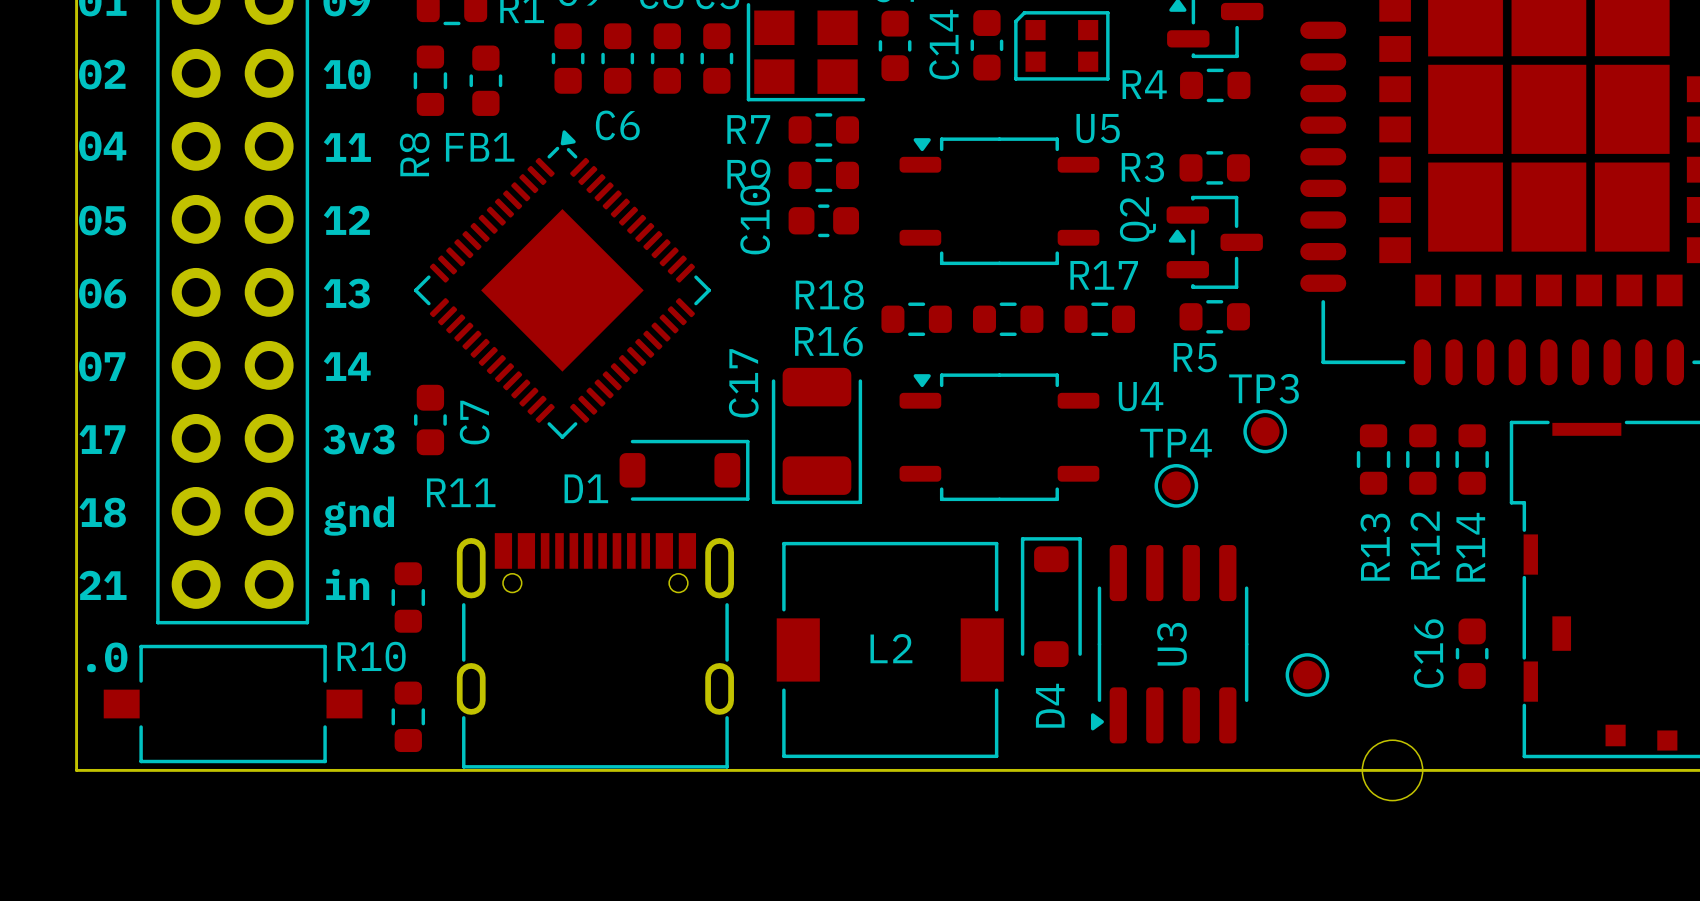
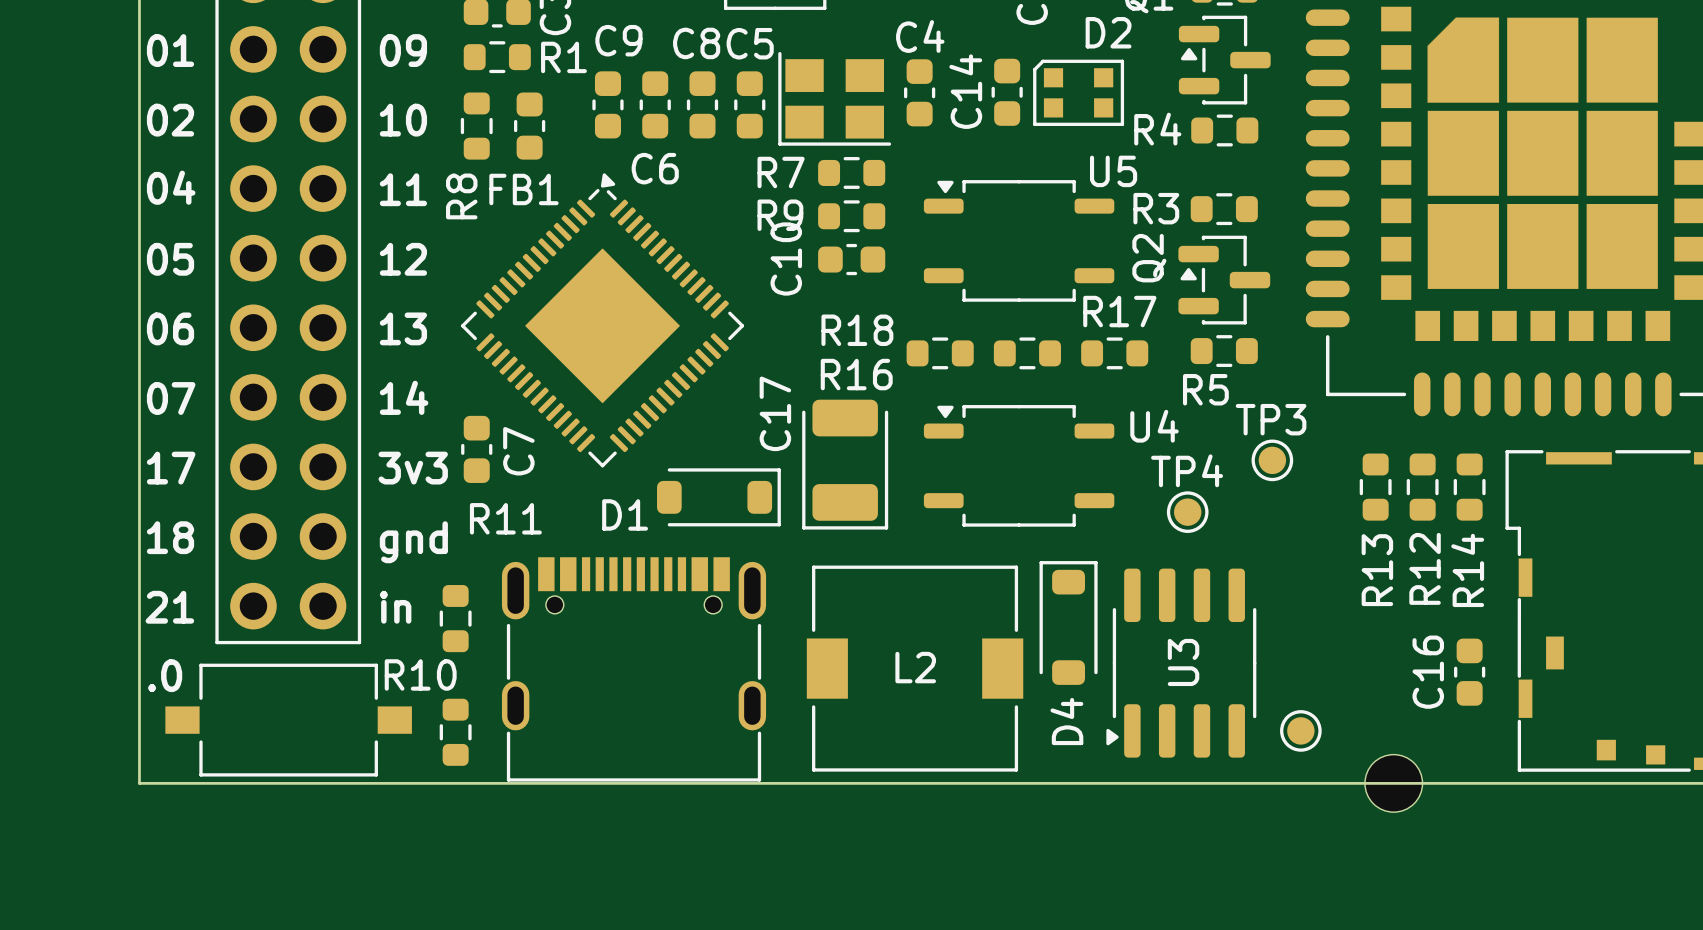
part position: (1307, 674) -> (1300, 730)

